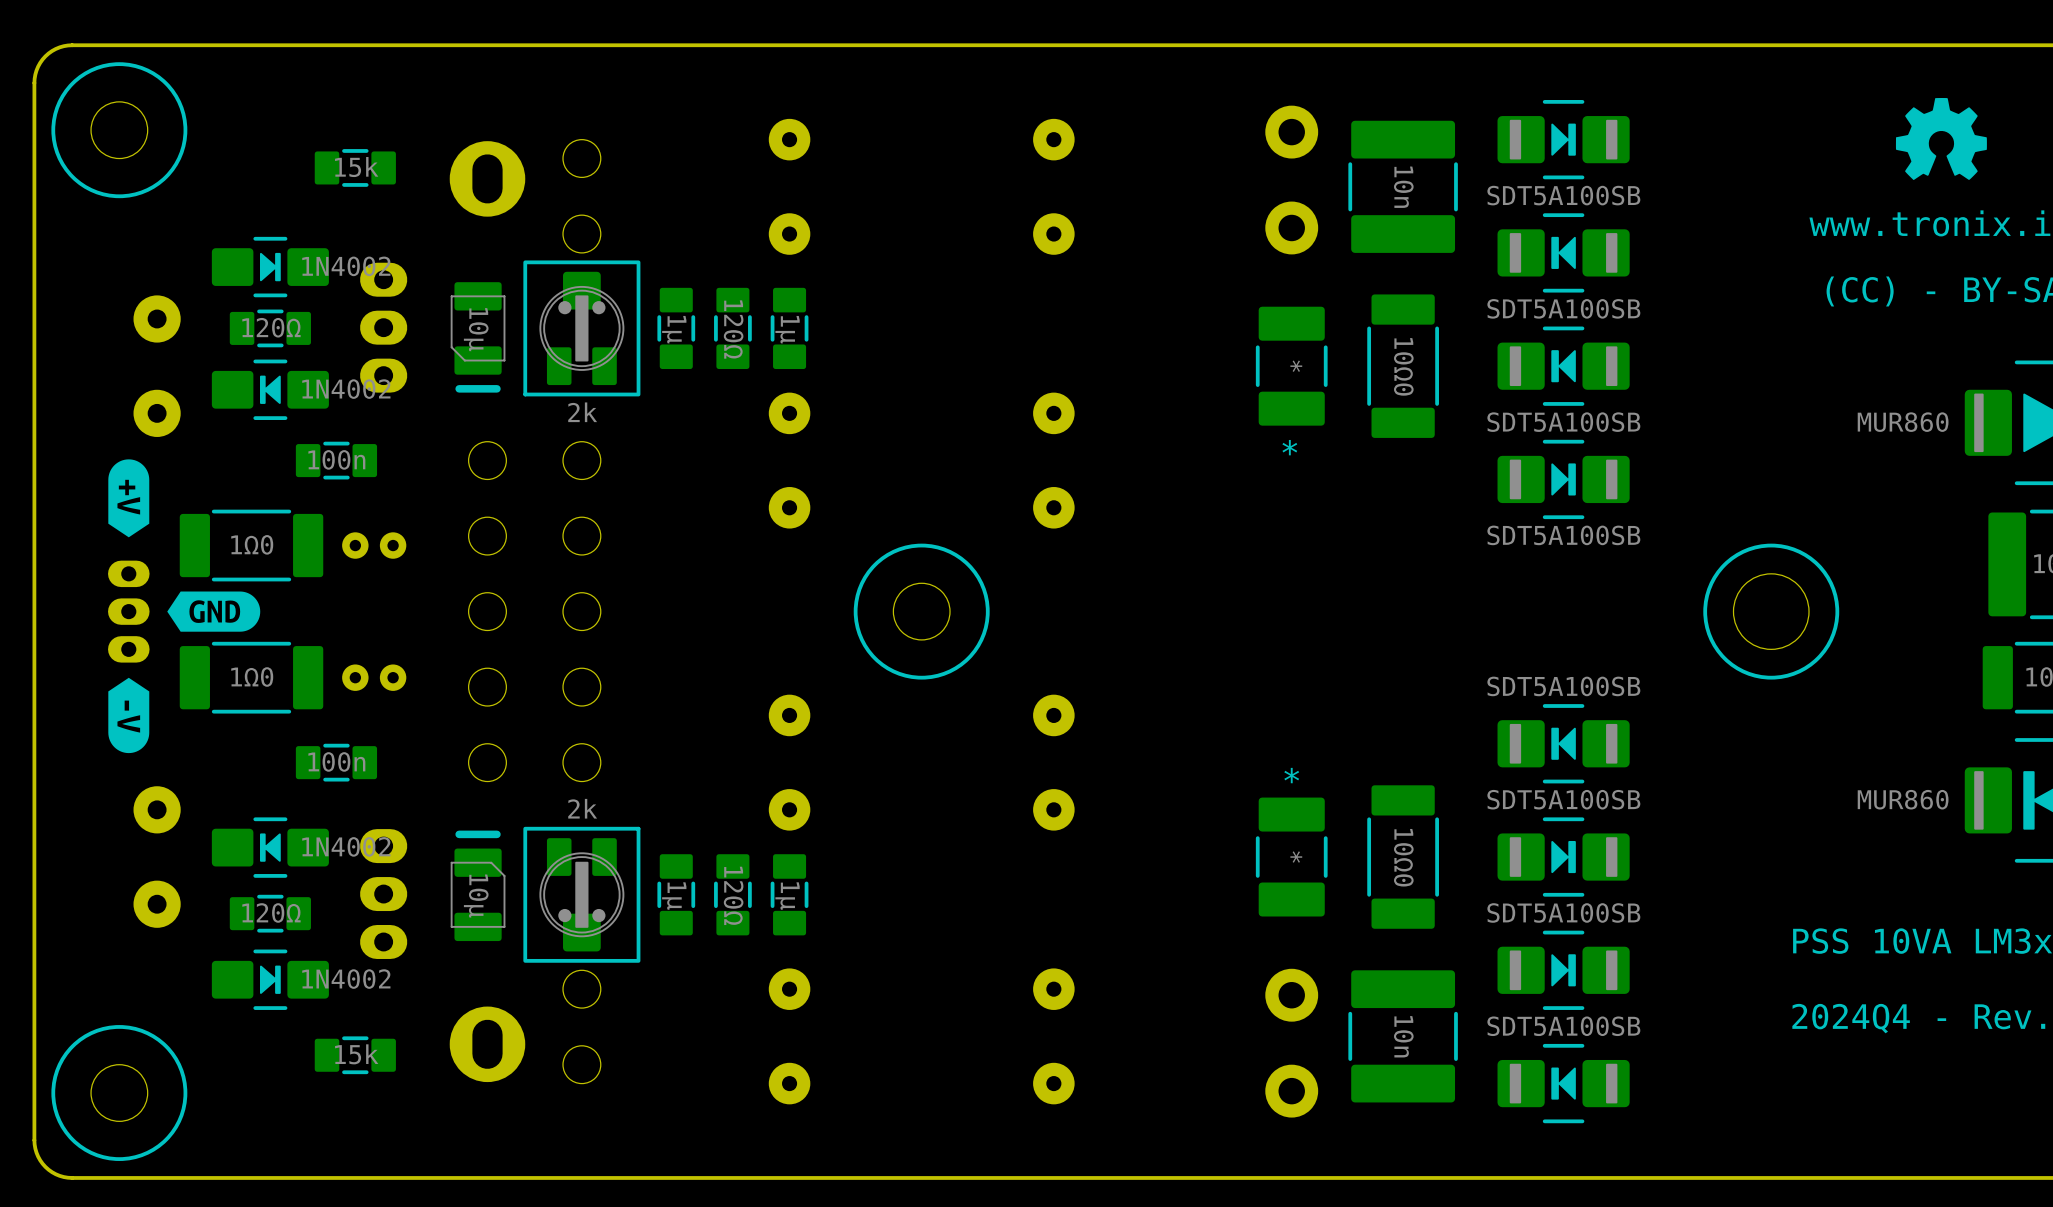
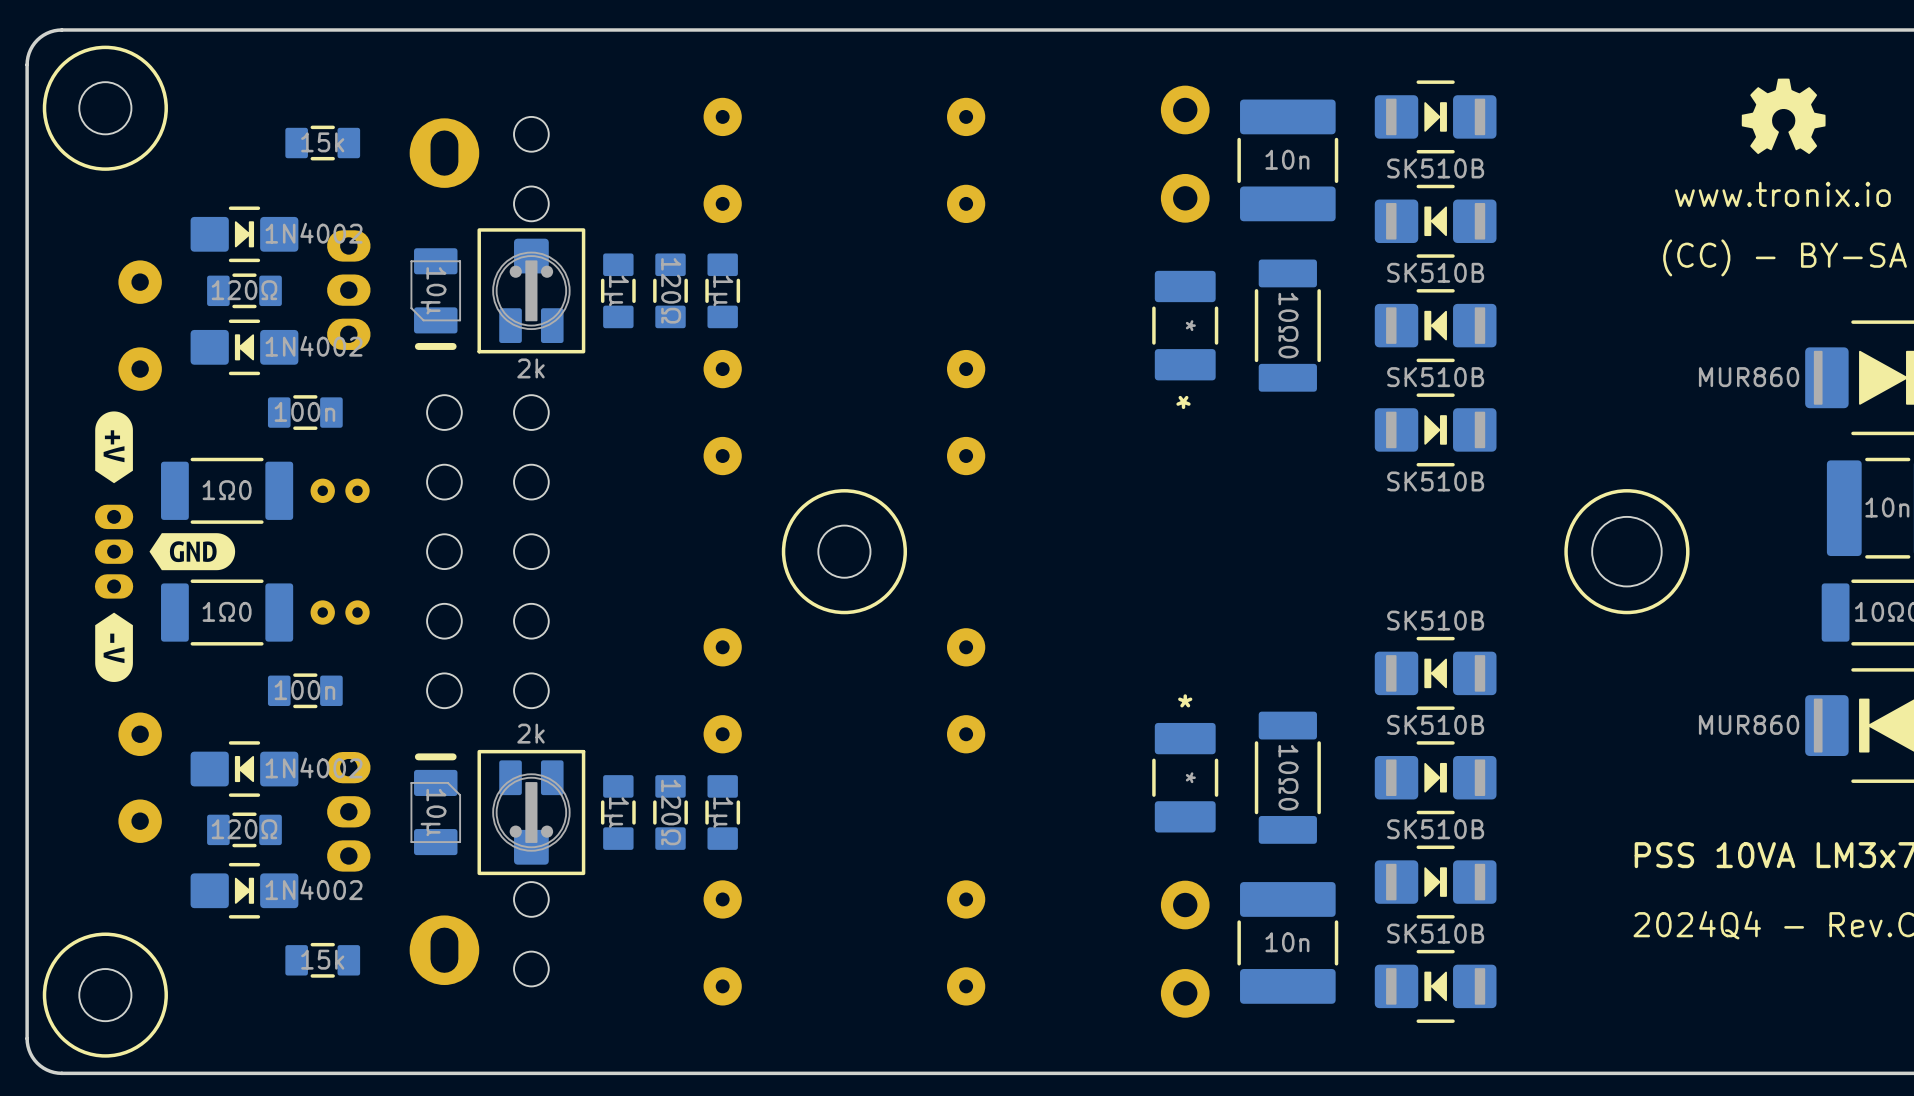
part value rotation: 0° (1403, 187) -> 90° counterclockwise (1287, 159)
part value: SDT5A100SB (1563, 195) -> SK510B (1435, 168)
part value: SDT5A100SB (1563, 308) -> SK510B (1435, 272)
part value: SDT5A100SB (1563, 422) -> SK510B (1435, 377)
part value: SDT5A100SB (1563, 535) -> SK510B (1435, 481)
part value: SDT5A100SB (1563, 686) -> SK510B (1435, 620)
part value: SDT5A100SB (1563, 799) -> SK510B (1435, 724)
part value: SDT5A100SB (1563, 912) -> SK510B (1435, 829)
part value: SDT5A100SB (1563, 1026) -> SK510B (1435, 933)
part value rotation: 0° (1403, 1036) -> 90° counterclockwise (1287, 942)

